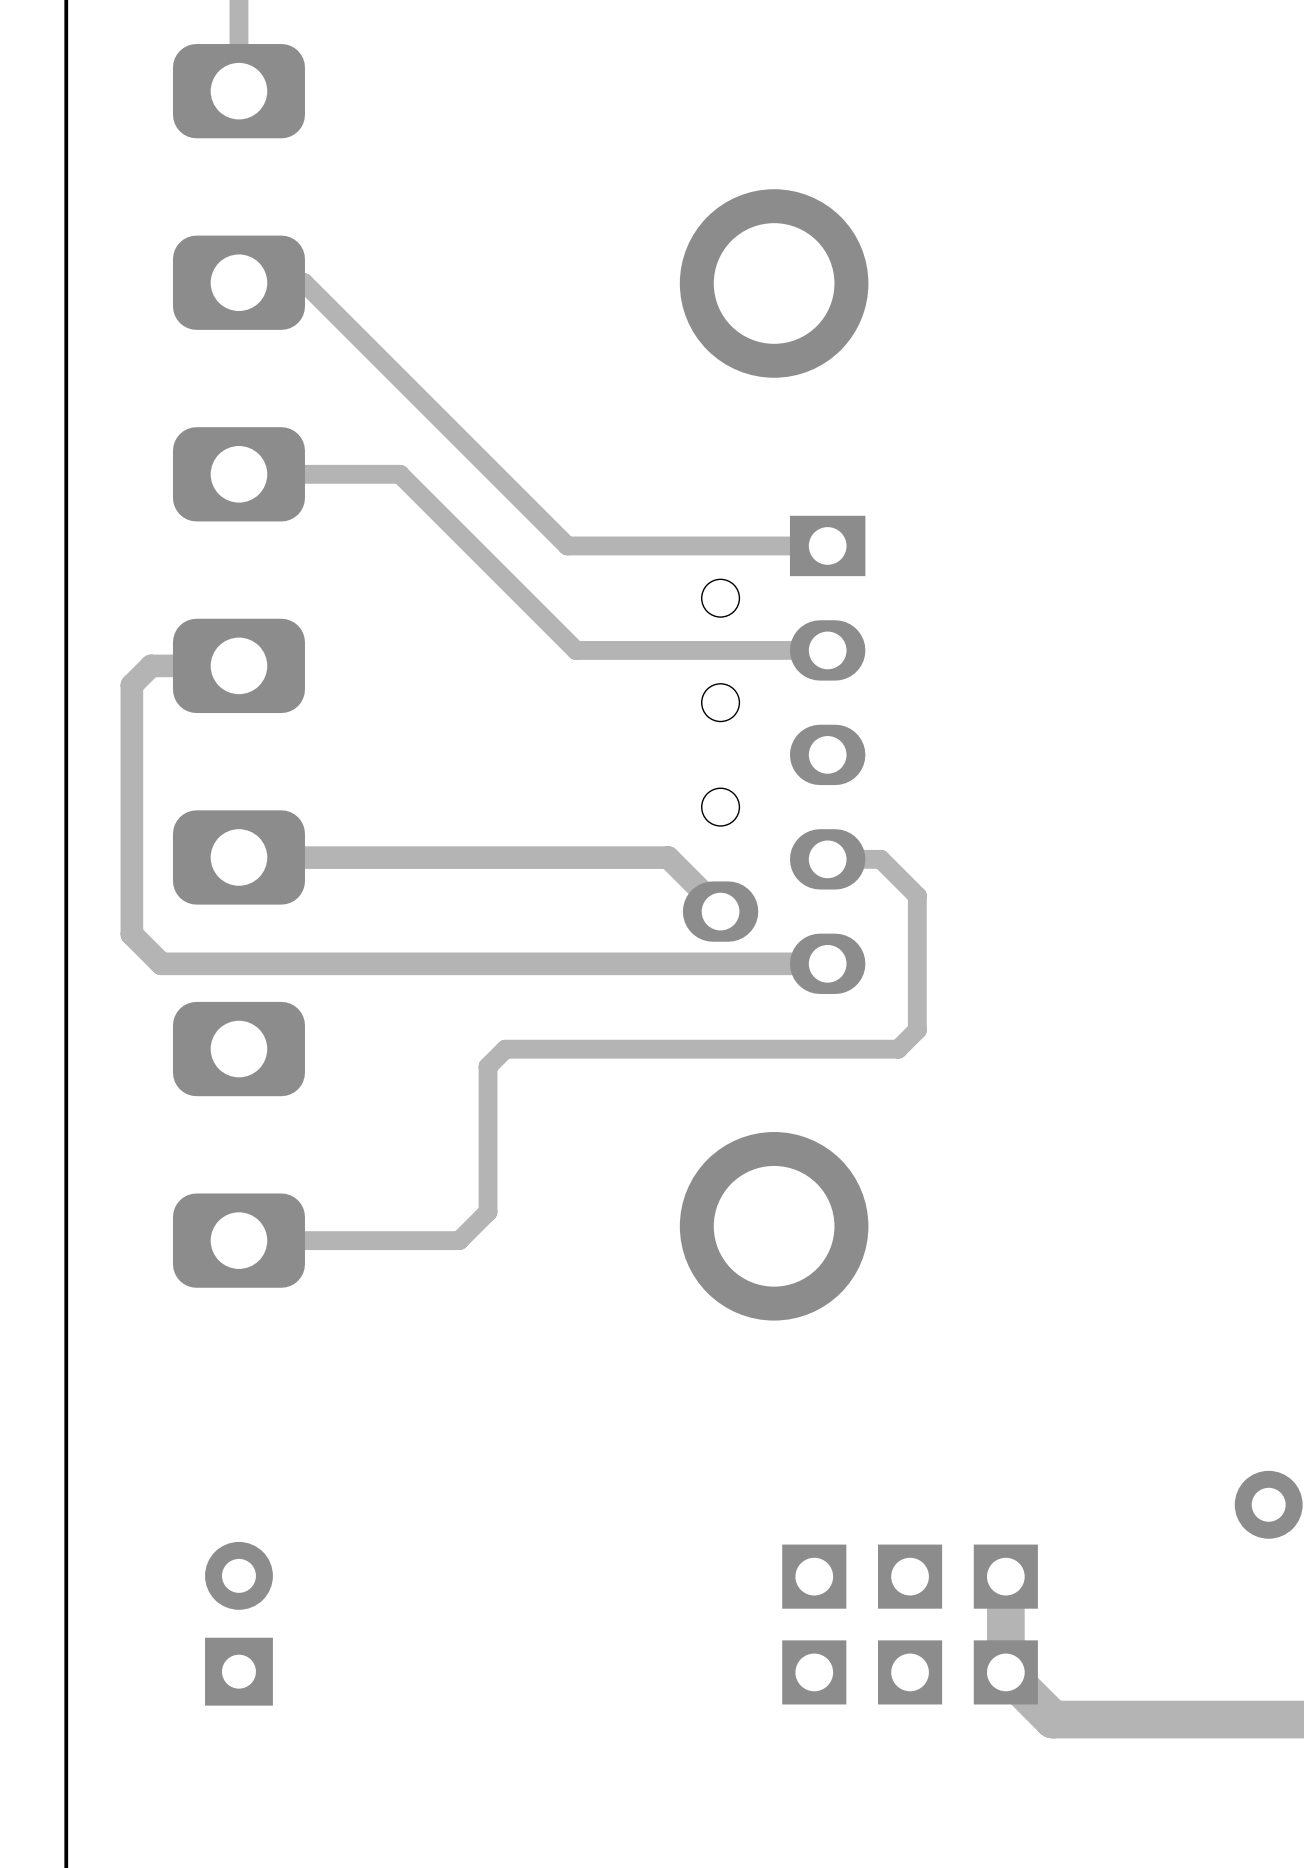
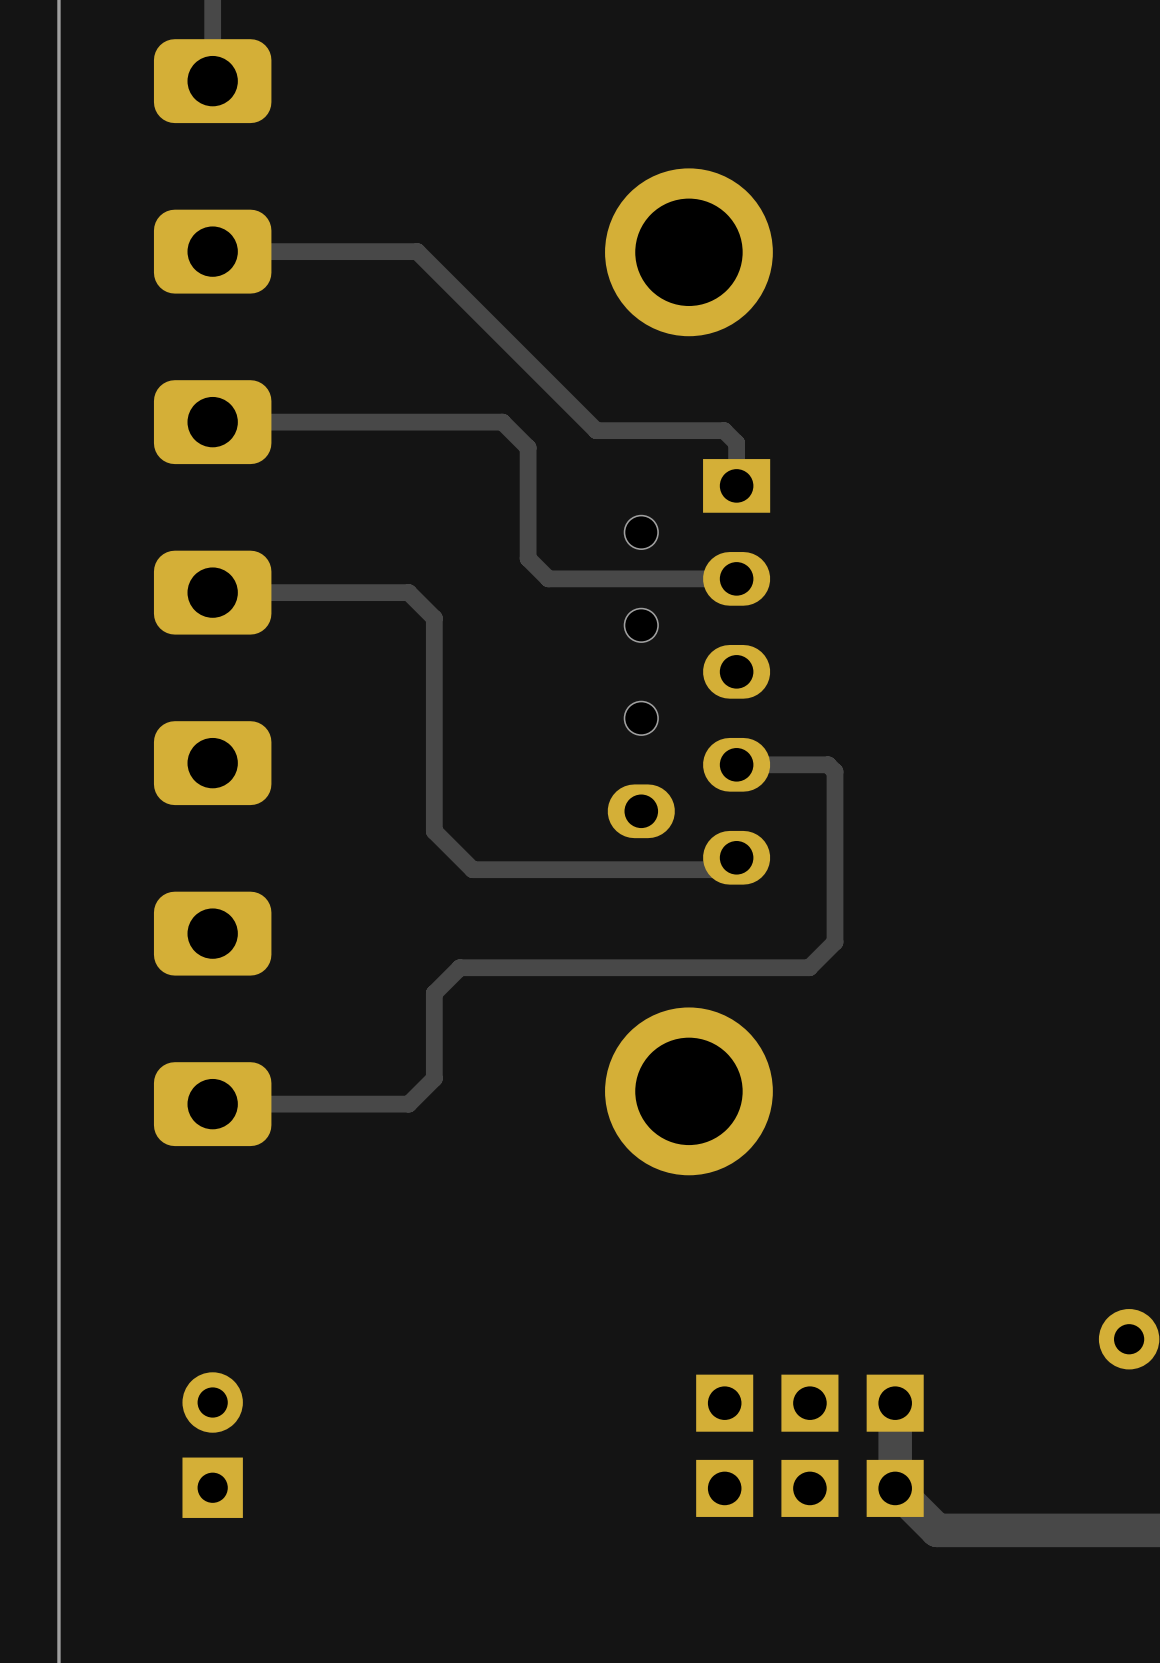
track: (304, 282) (567, 545) (827, 545) -> (270, 251) (417, 251) (596, 430) (724, 430) (736, 443) (736, 485)
track: (399, 474) (576, 650) (616, 650) -> (355, 422) (502, 422) (528, 447) (528, 558) (548, 578)
track: (238, 665) (151, 665) (131, 685) (131, 934) (161, 963) (827, 963) -> (212, 592) (408, 592) (434, 618) (434, 831) (472, 869) (724, 869) (736, 857)
track: (239, 857) (668, 857) (720, 911) -> none
track: (880, 859) (917, 895) (917, 1030) (898, 1049) (505, 1049) (488, 1066) (488, 1116) -> (783, 764) (828, 764) (835, 771) (835, 942) (809, 967) (459, 967) (434, 993)

